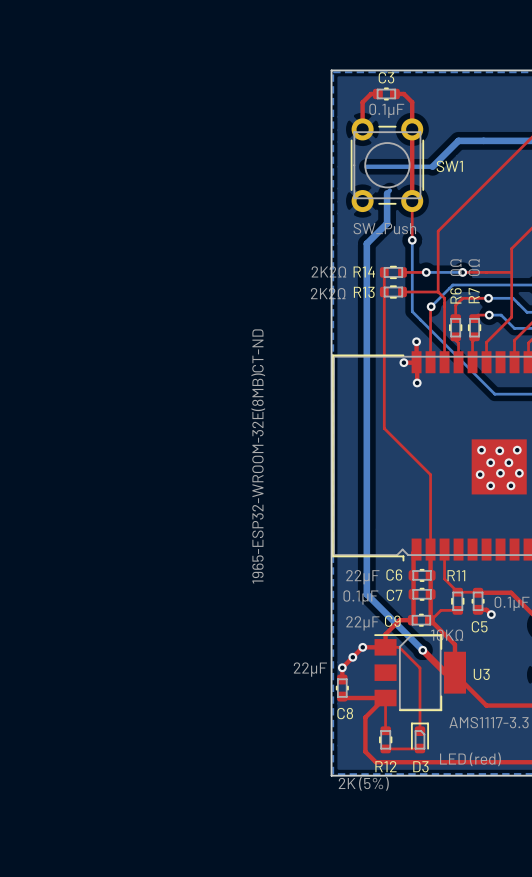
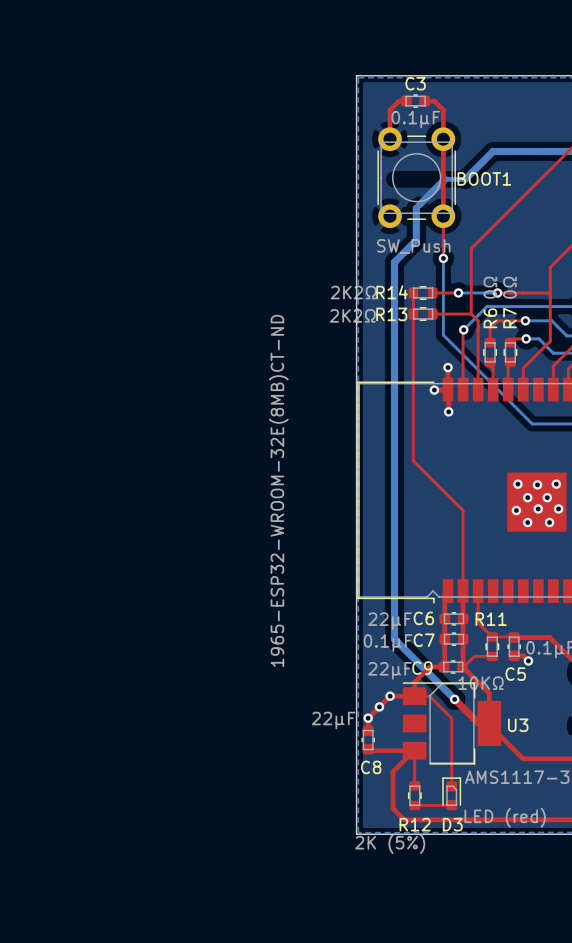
bottom track: (366, 166) (413, 166) -> (419, 204) (444, 179)
SW1 name: SW1 (449, 166) -> BOOT1 (484, 178)

